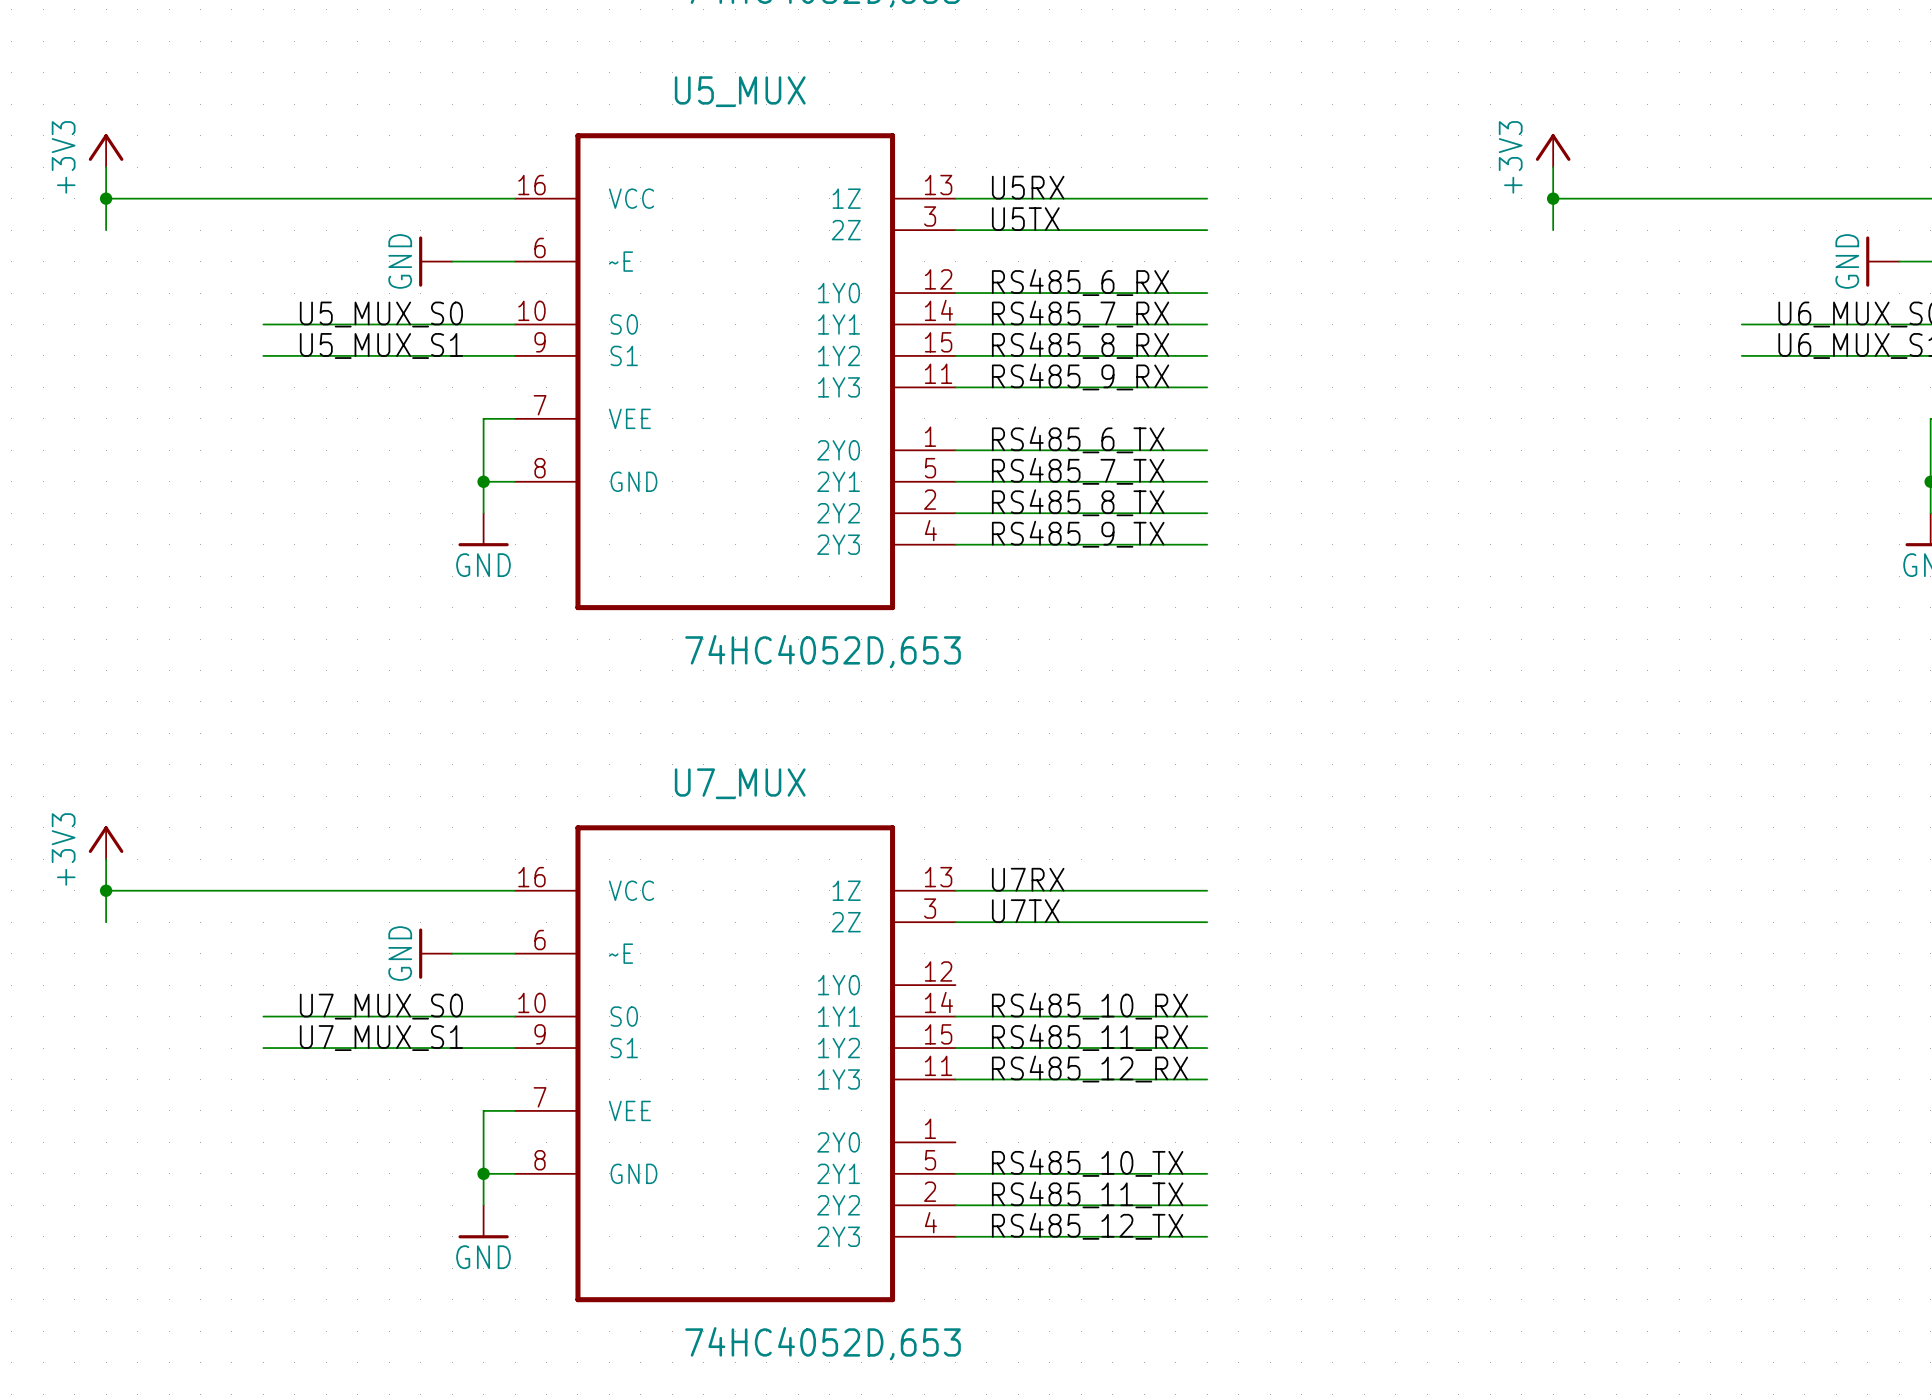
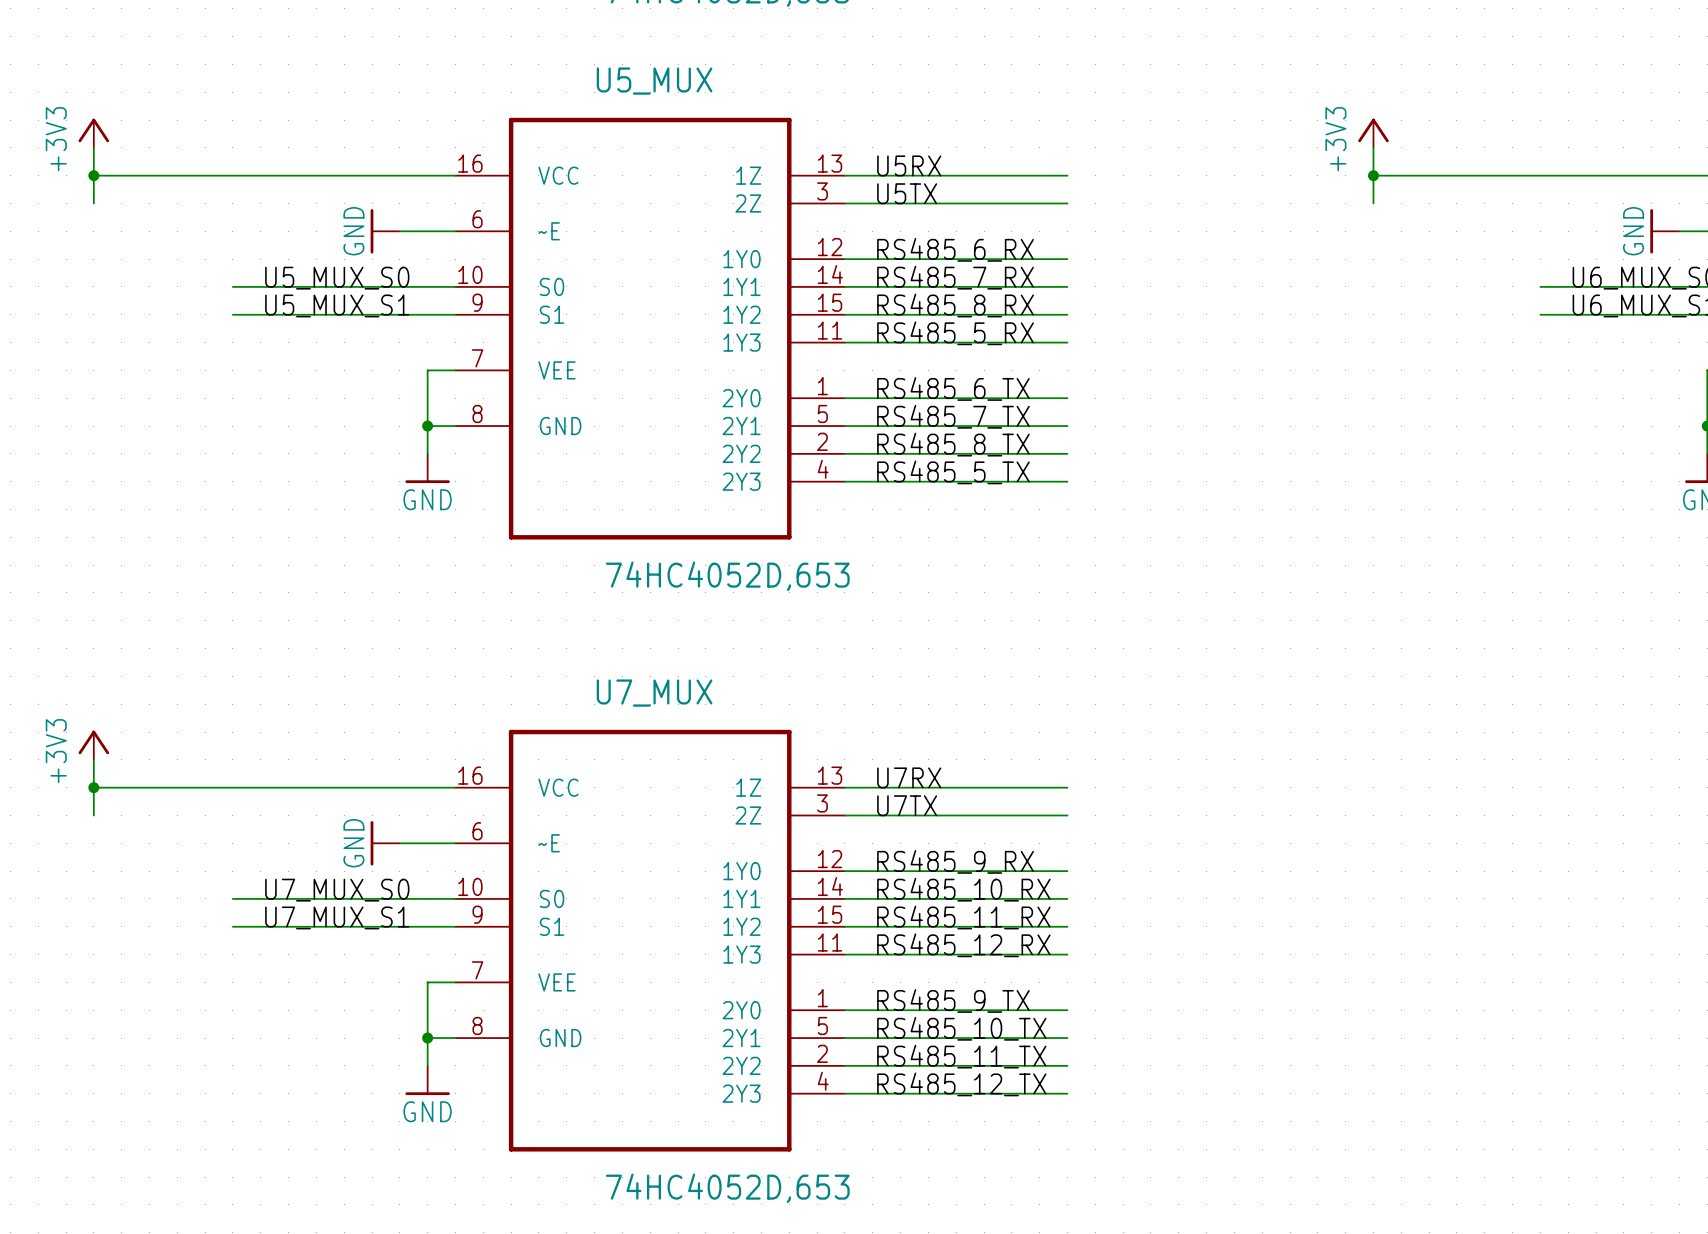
label: RS485_9_RX (1080, 376) -> RS485_5_RX (955, 333)
label: RS485_9_TX (1078, 534) -> RS485_5_TX (953, 472)
label: none -> RS485_9_RX (955, 861)
wire: none -> (844, 871) (1067, 871)
label: none -> RS485_9_TX (953, 1000)
wire: none -> (844, 1010) (1067, 1010)

